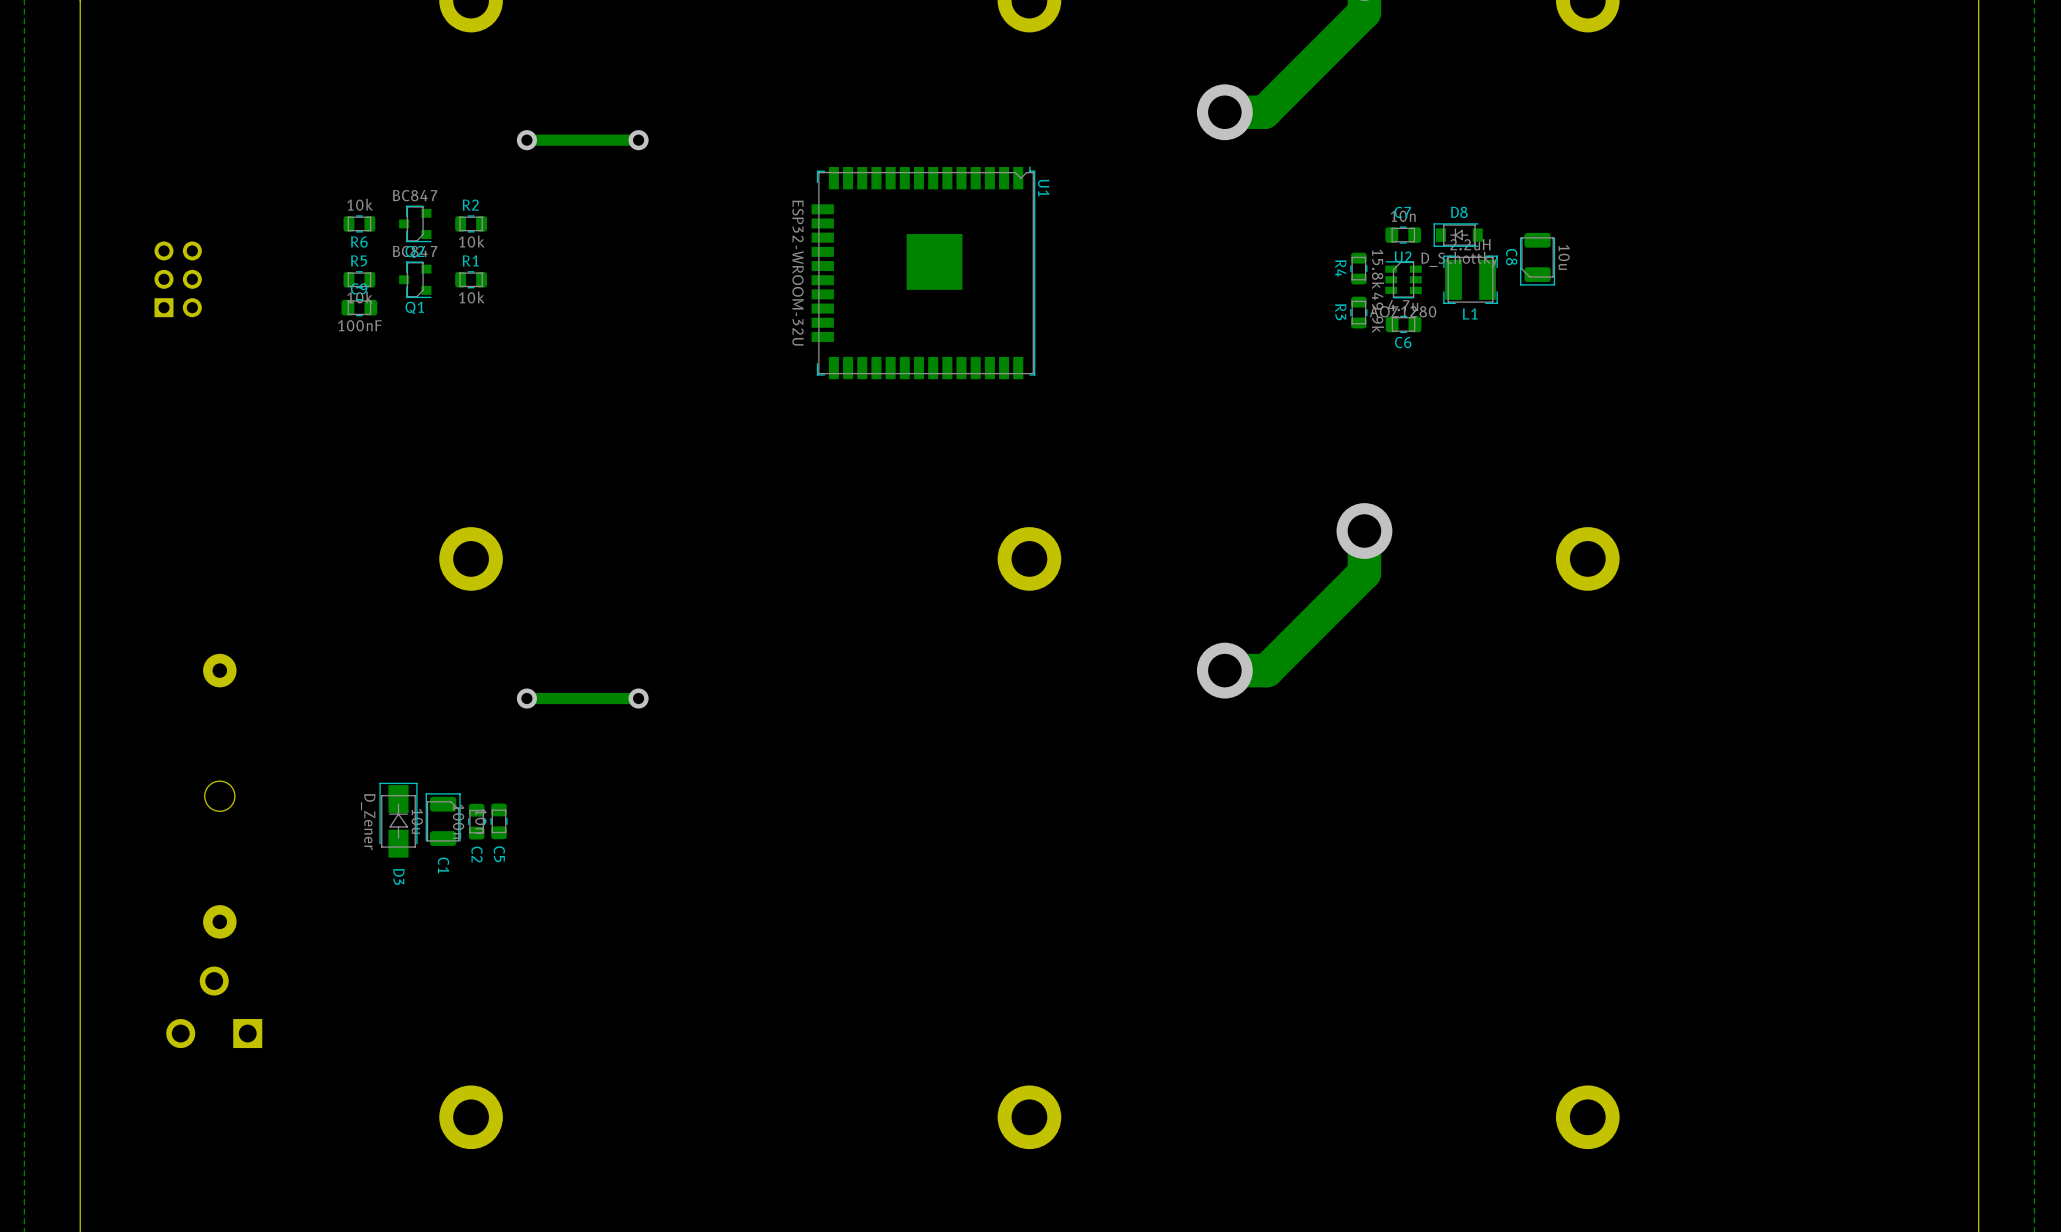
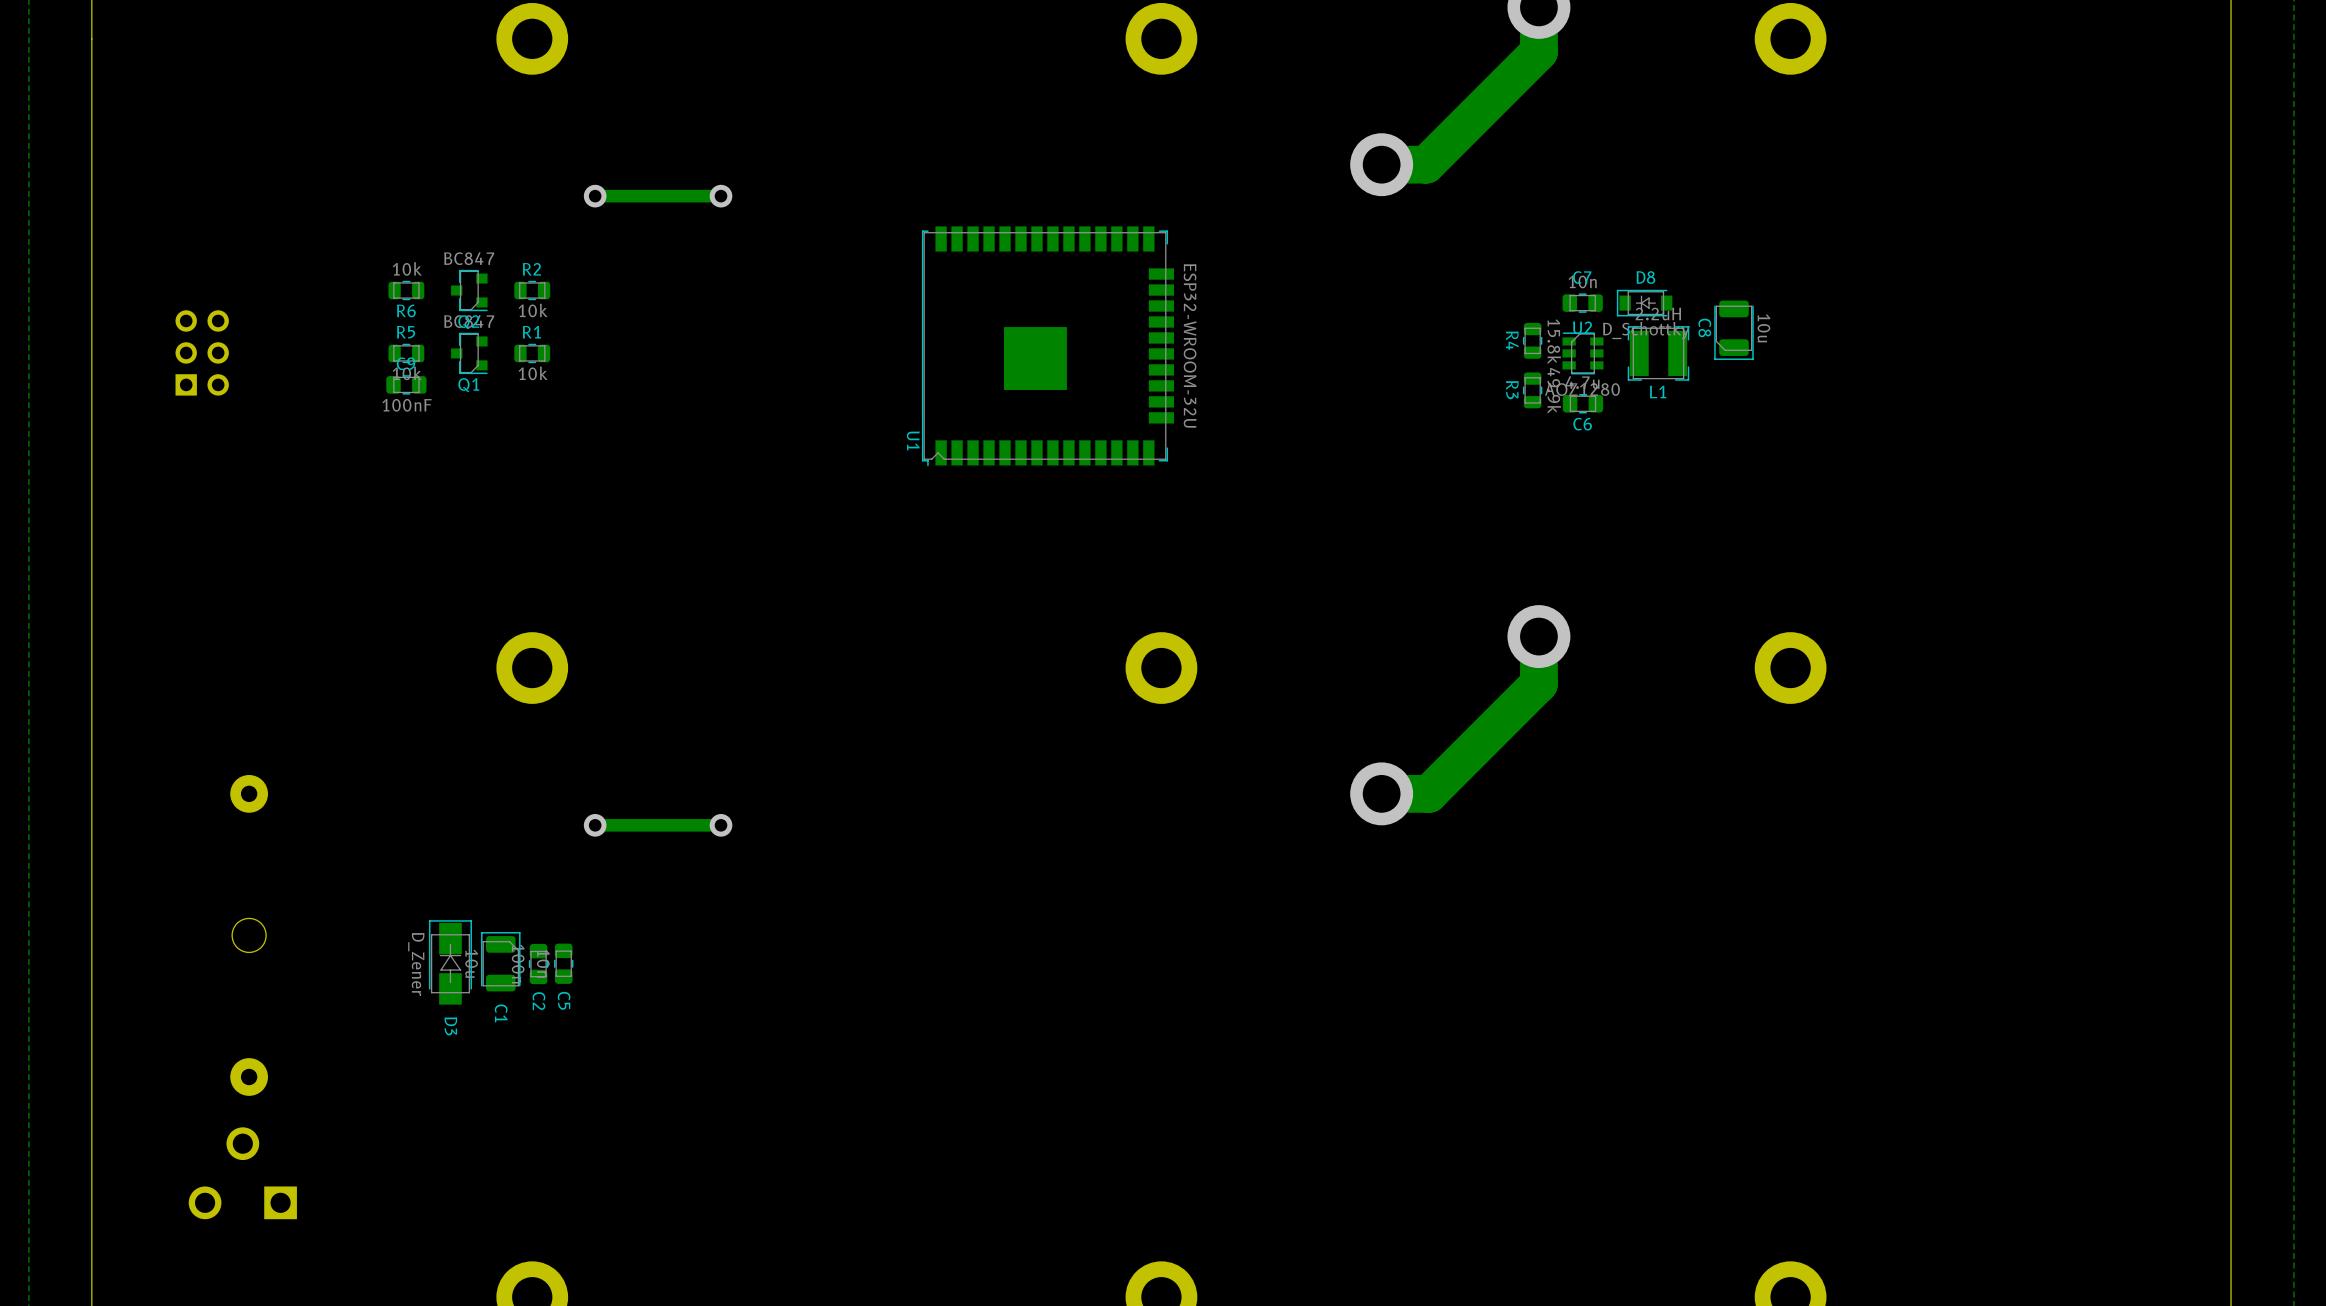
U1 rotation: 0° (923, 272) -> 180° (1047, 346)

